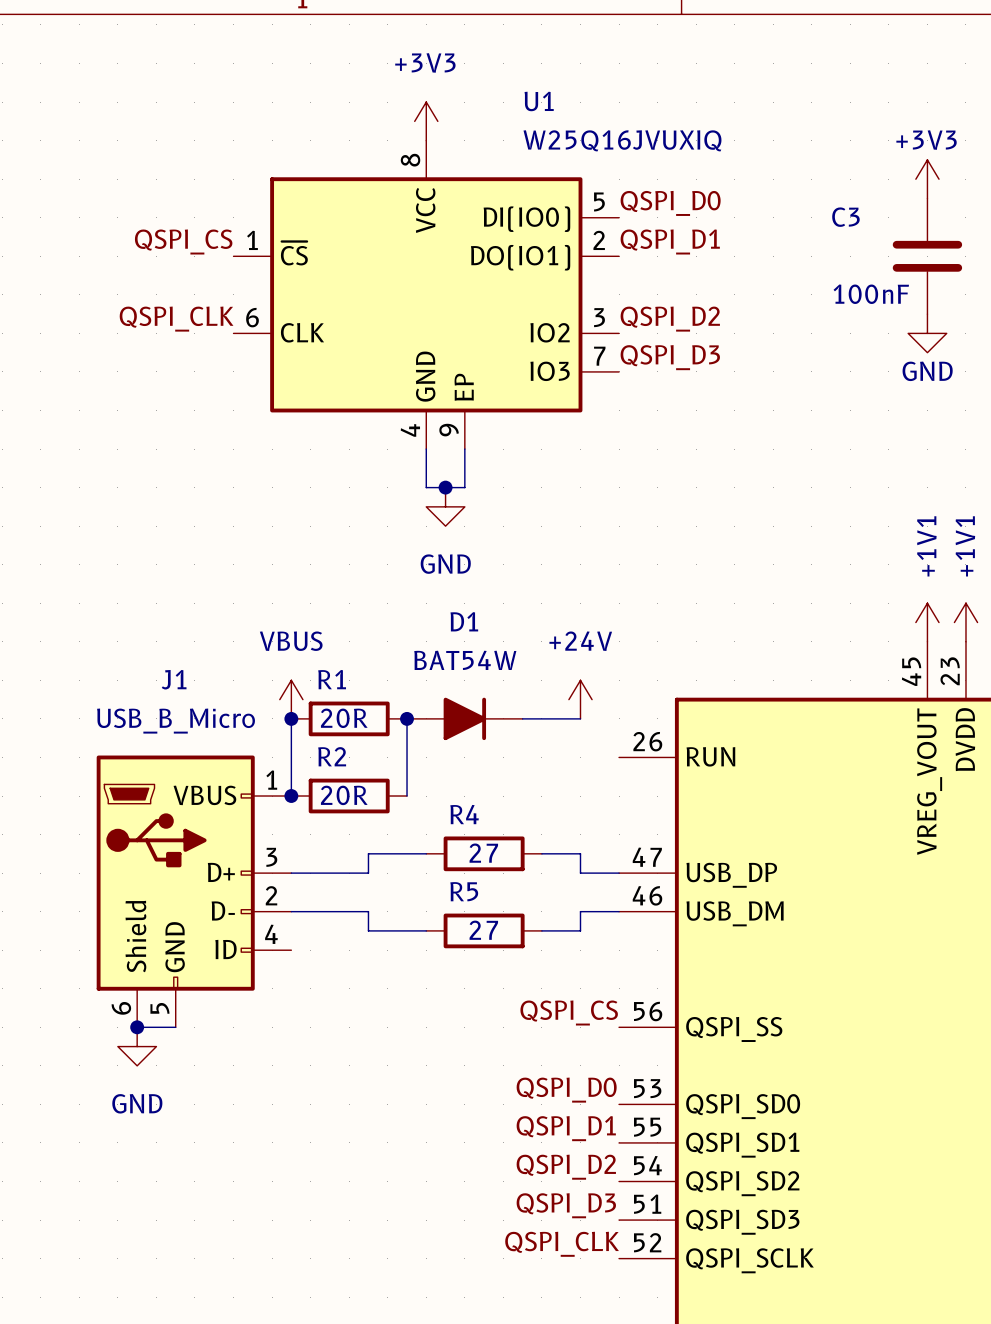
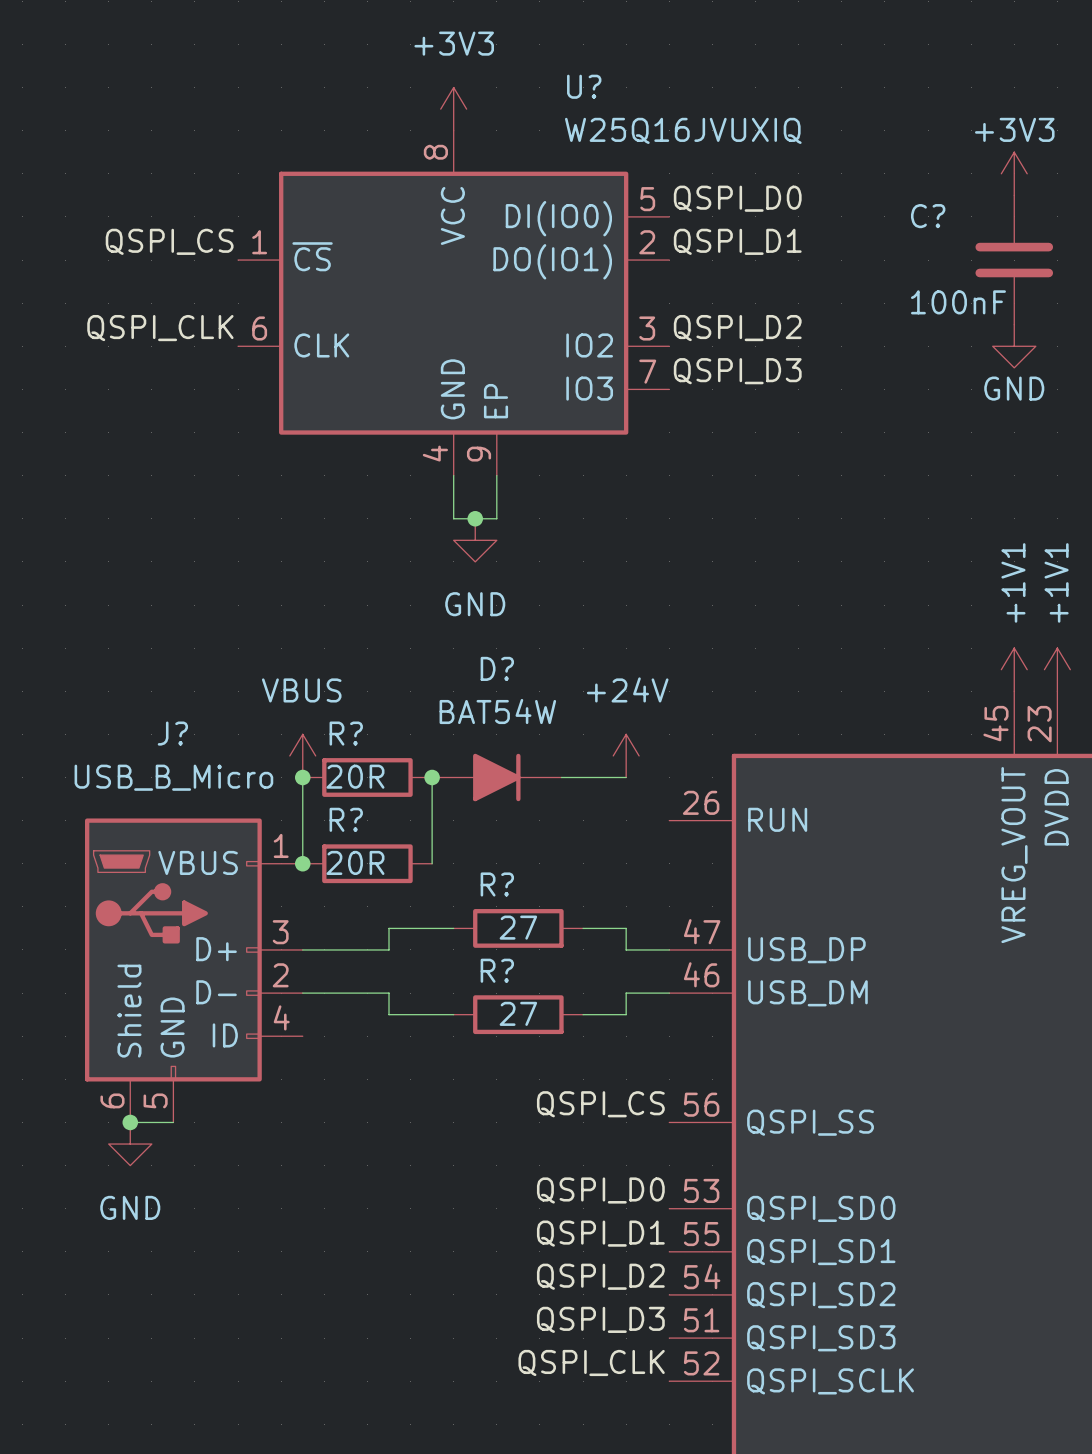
U1 name: U1 (539, 101) -> U? (584, 86)
C3 name: C3 (845, 217) -> C? (928, 216)
D1 name: D1 (464, 621) -> D? (497, 668)
J1 name: J1 (174, 679) -> J? (172, 733)
R1 name: R1 (332, 679) -> R? (346, 733)
R2 name: R2 (332, 756) -> R? (346, 819)
R4 name: R4 (464, 814) -> R? (497, 884)
R5 name: R5 (464, 891) -> R? (497, 970)

